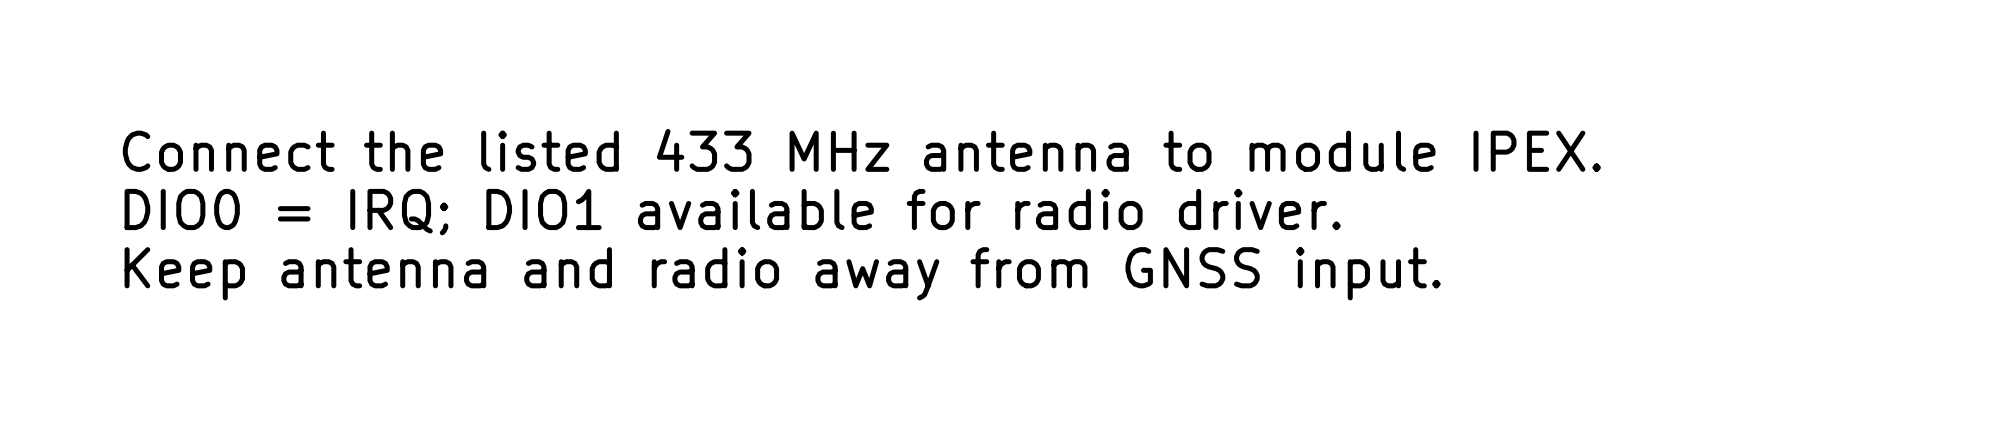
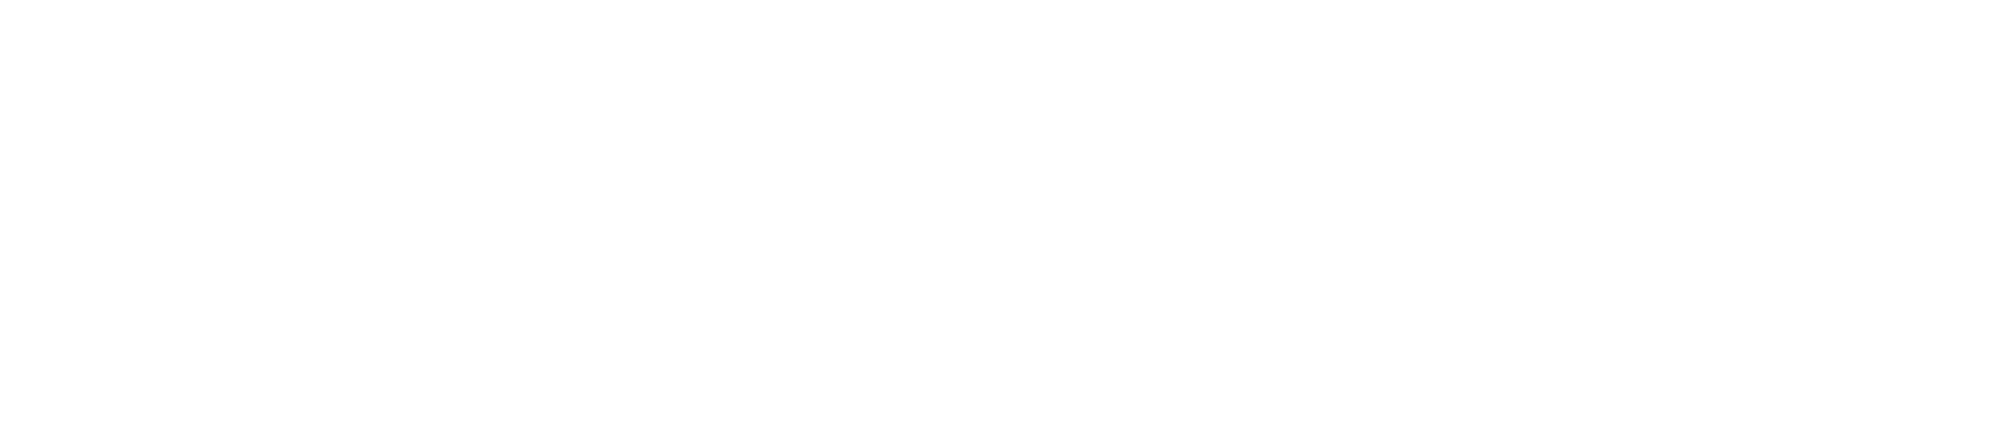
text: Connect the listed 433 MHz antenna to module IPEX. (861, 150) -> none
text: DIO0 = IRQ; DIO1 available for radio driver. (732, 212) -> none
text: Keep antenna and radio away from GNSS input. (782, 273) -> none

